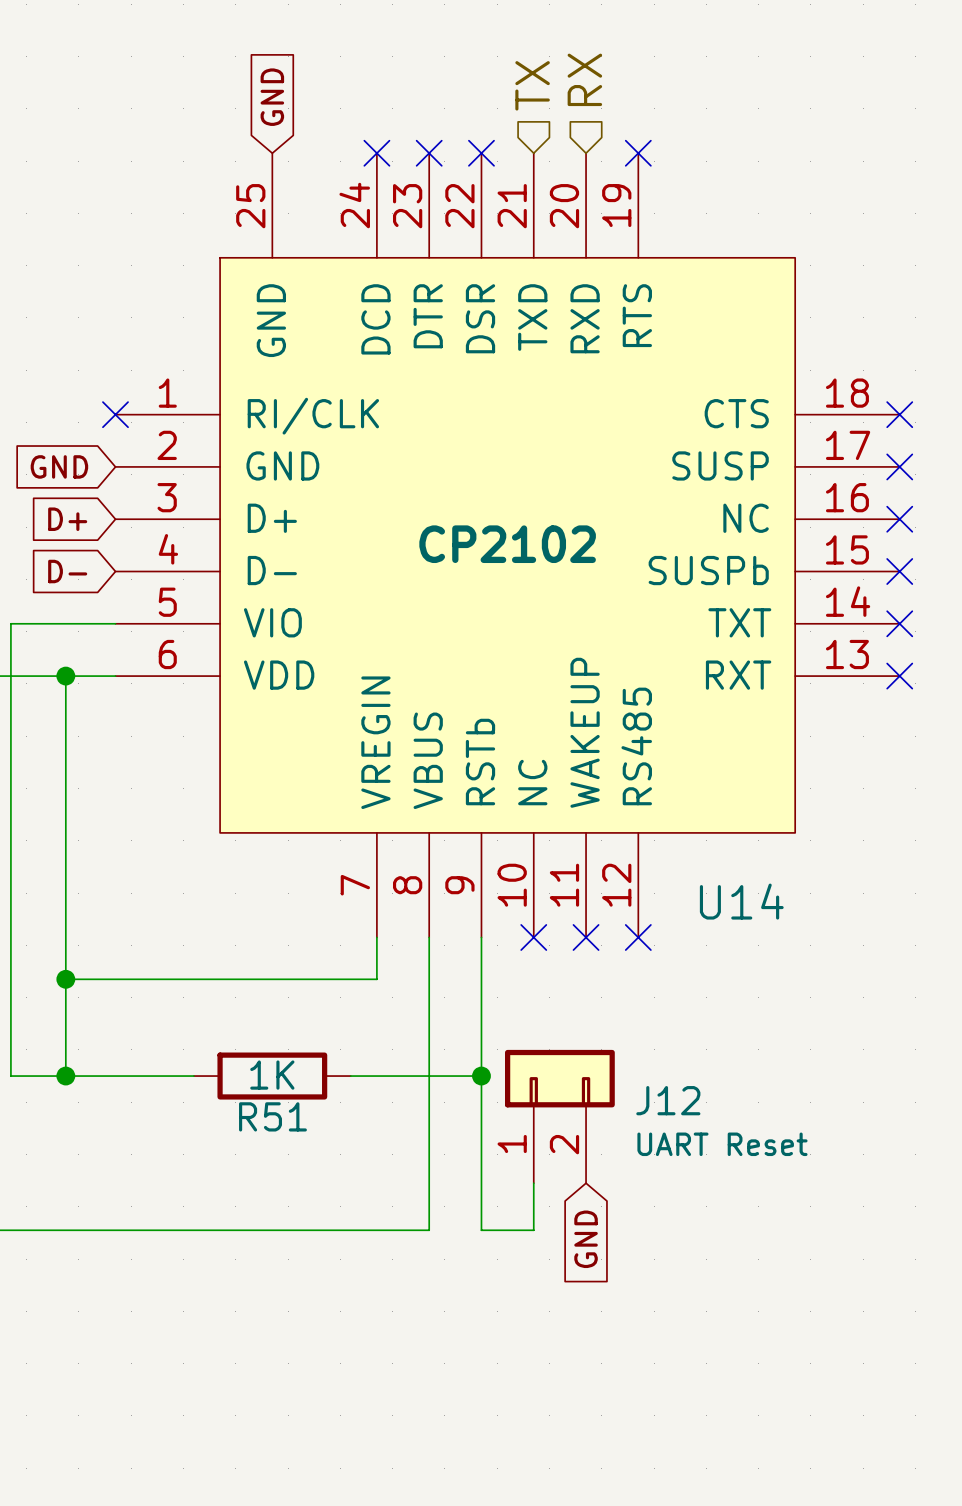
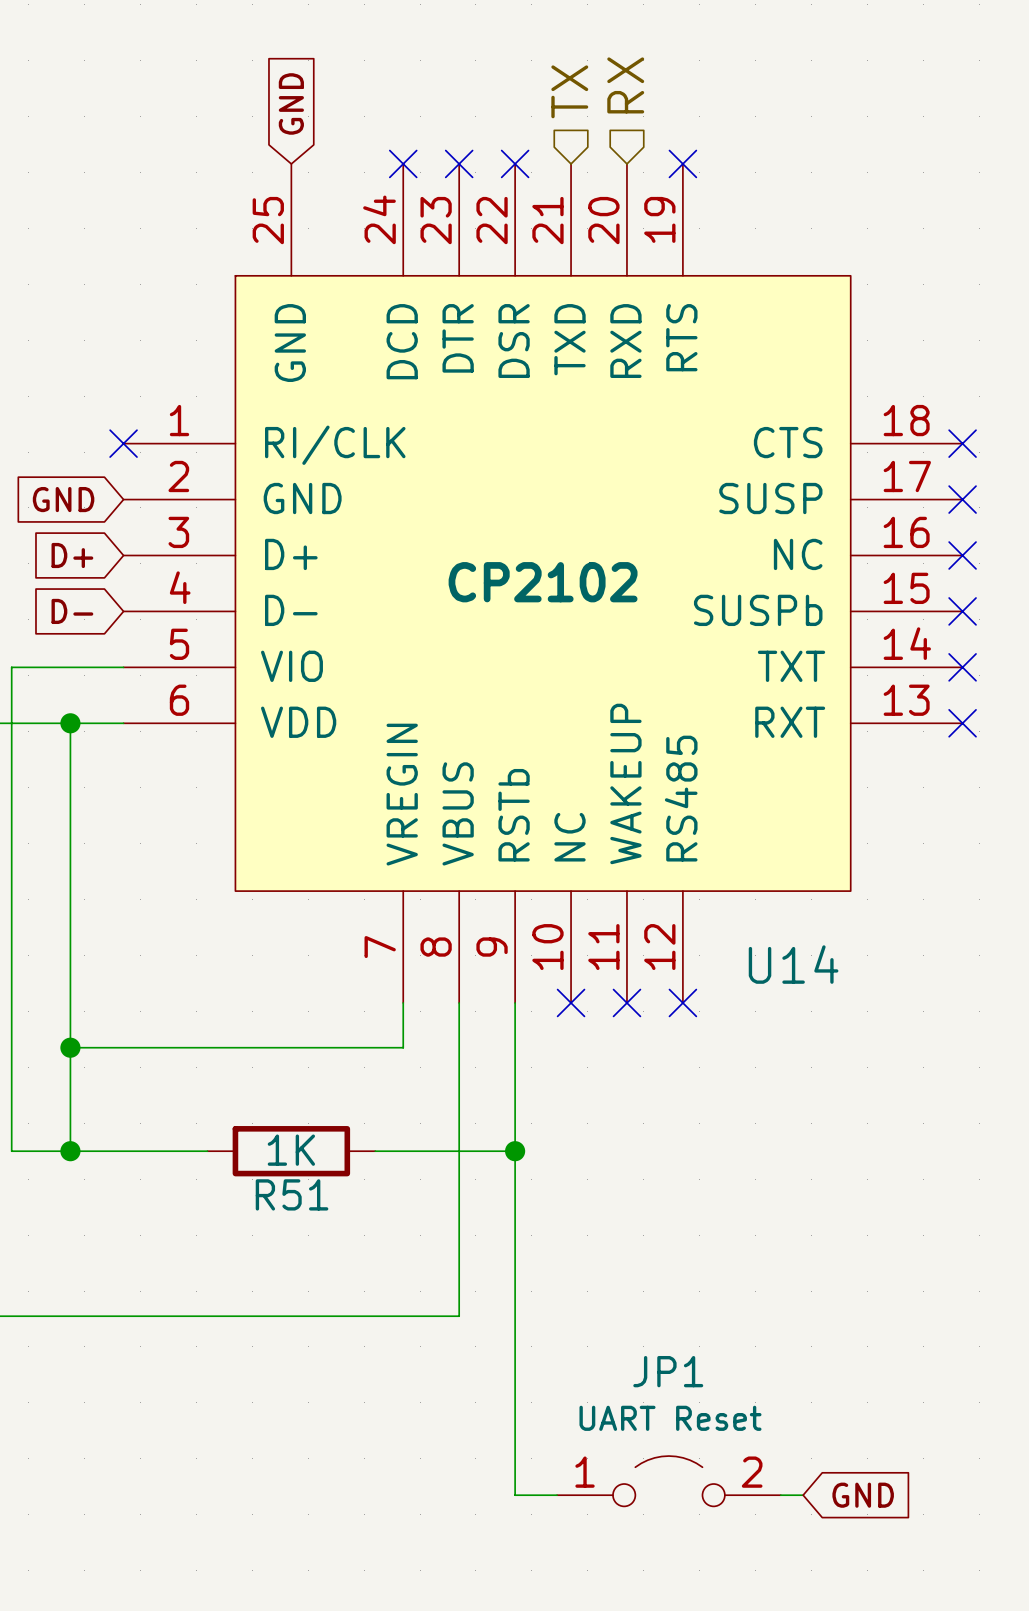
J12: UART Reset (559, 1116) -> none
wire: (533, 1183) (533, 1230) (481, 1230) -> (557, 1495) (515, 1495) (515, 1316)
global label rotation: 0° (586, 1239) -> 90° counterclockwise (863, 1495)
global label position: GND (586, 1239) -> GND (863, 1495)
JP1: none -> UART Reset (668, 1481)
wire: none -> (780, 1495) (803, 1495)

